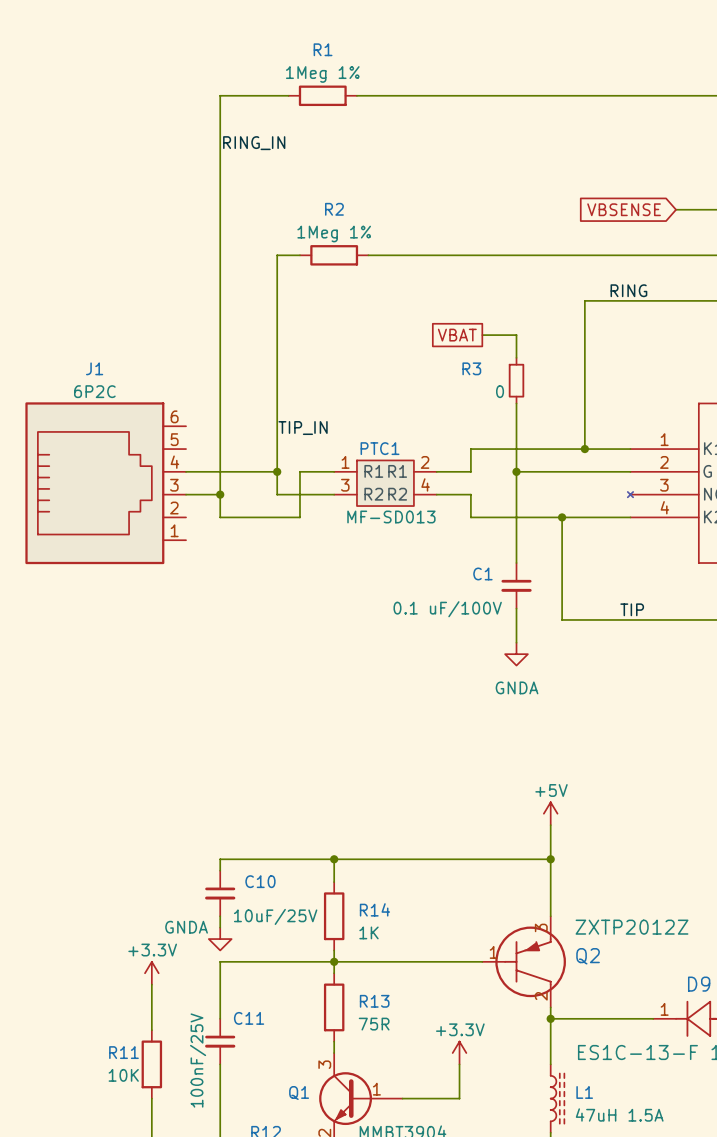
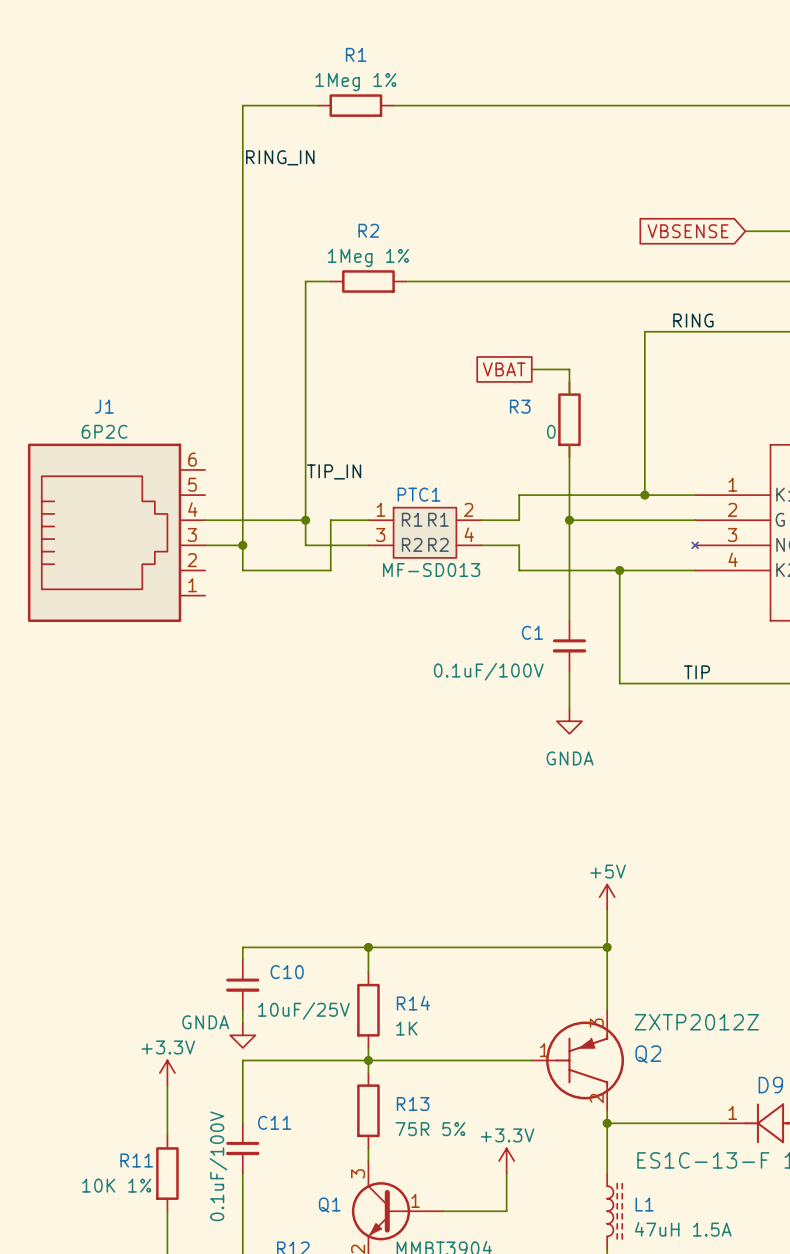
R3 symbol: [508, 357, 525, 404] -> [558, 382, 581, 458]
C1 value: 0.1 uF/100V (447, 609) -> 0.1uF/100V (488, 671)
R13 value: 75R (374, 1024) -> 75R 5% (430, 1129)
C11 value: 100nF/25V (198, 1060) -> 0.1uF/100V (218, 1166)
R11 value: 10K (123, 1075) -> 10K 1% (116, 1185)

